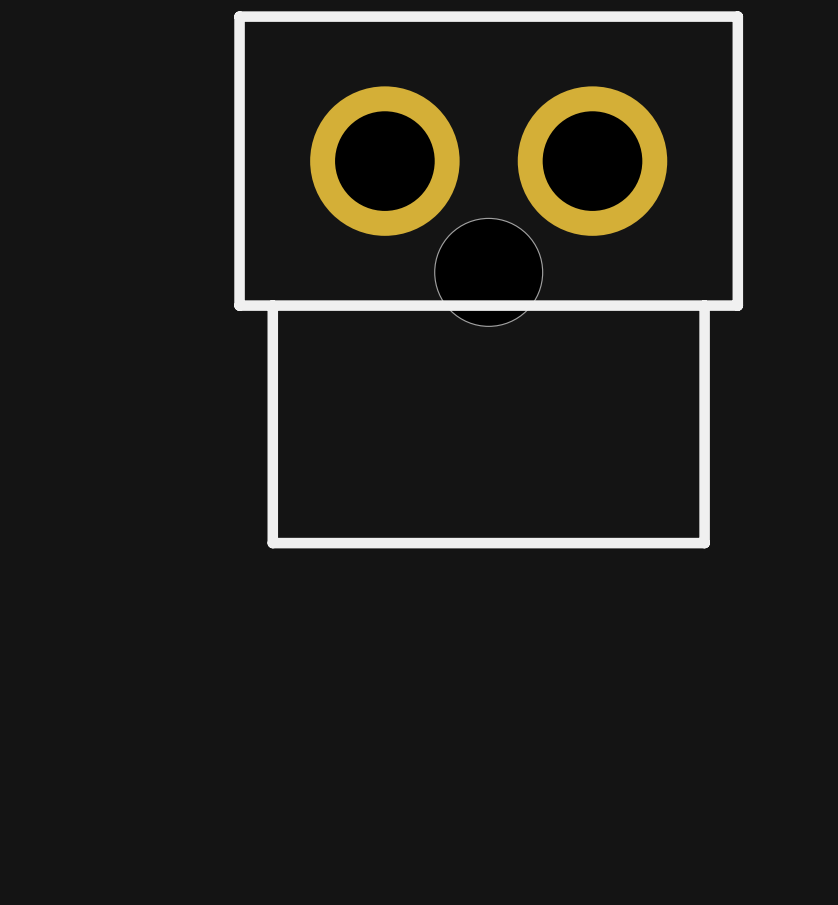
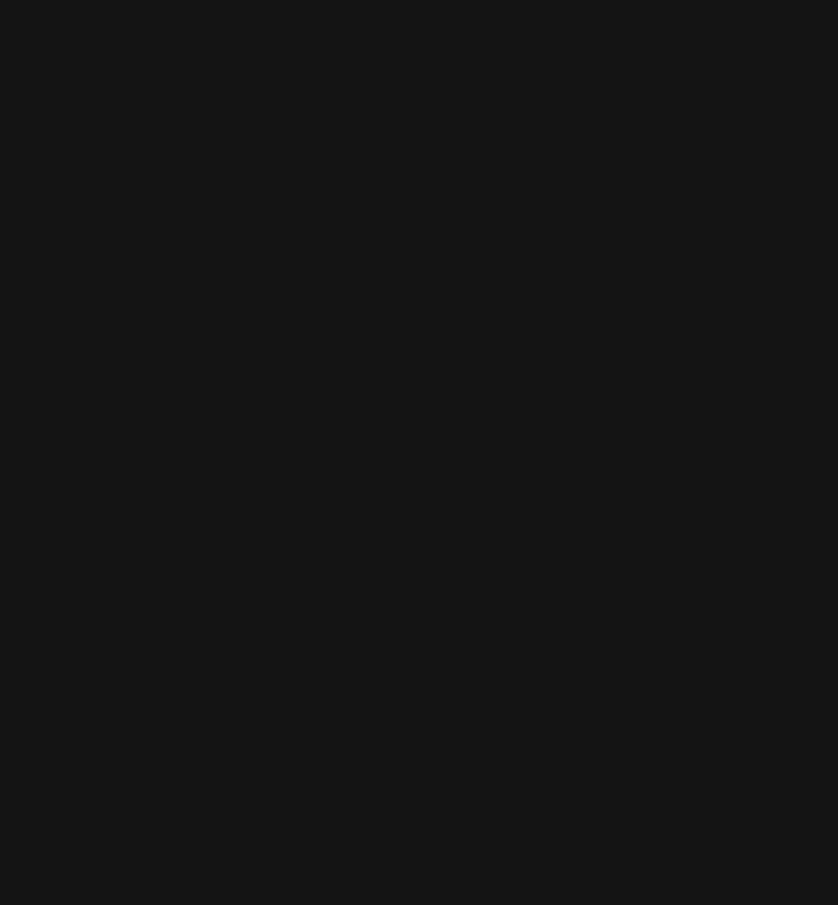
part: (488, 279) -> none

